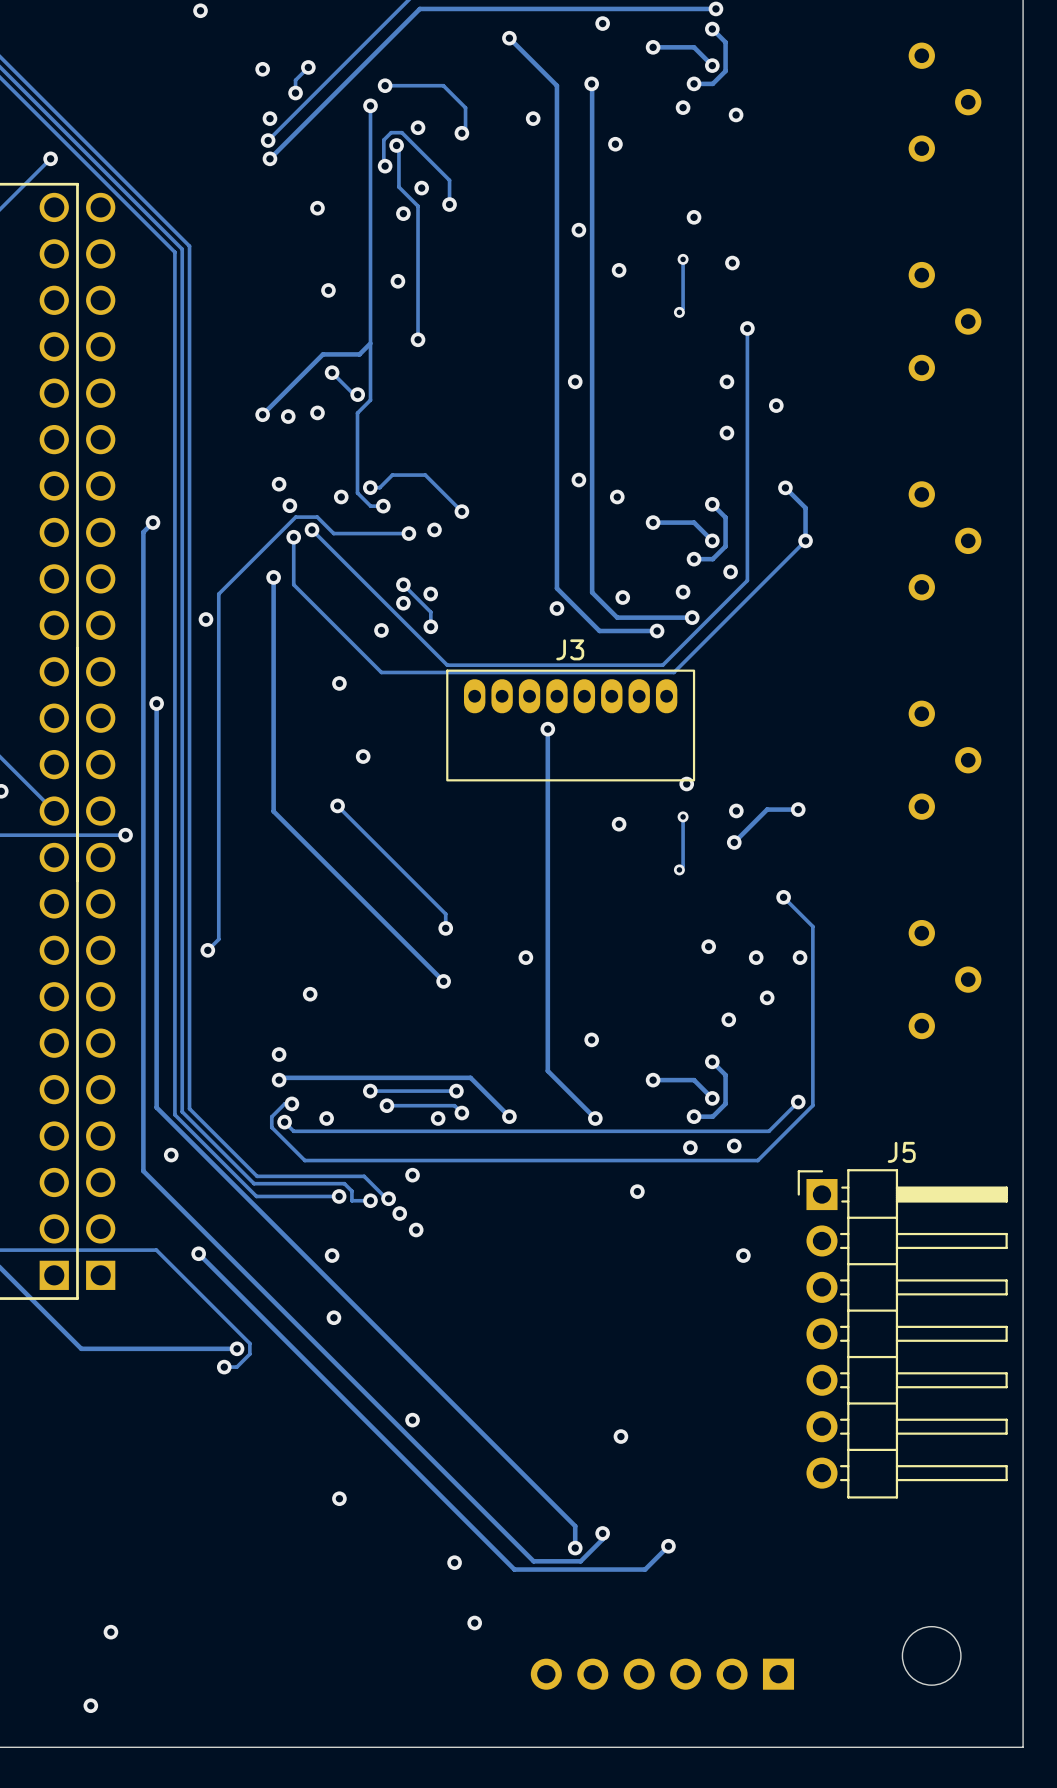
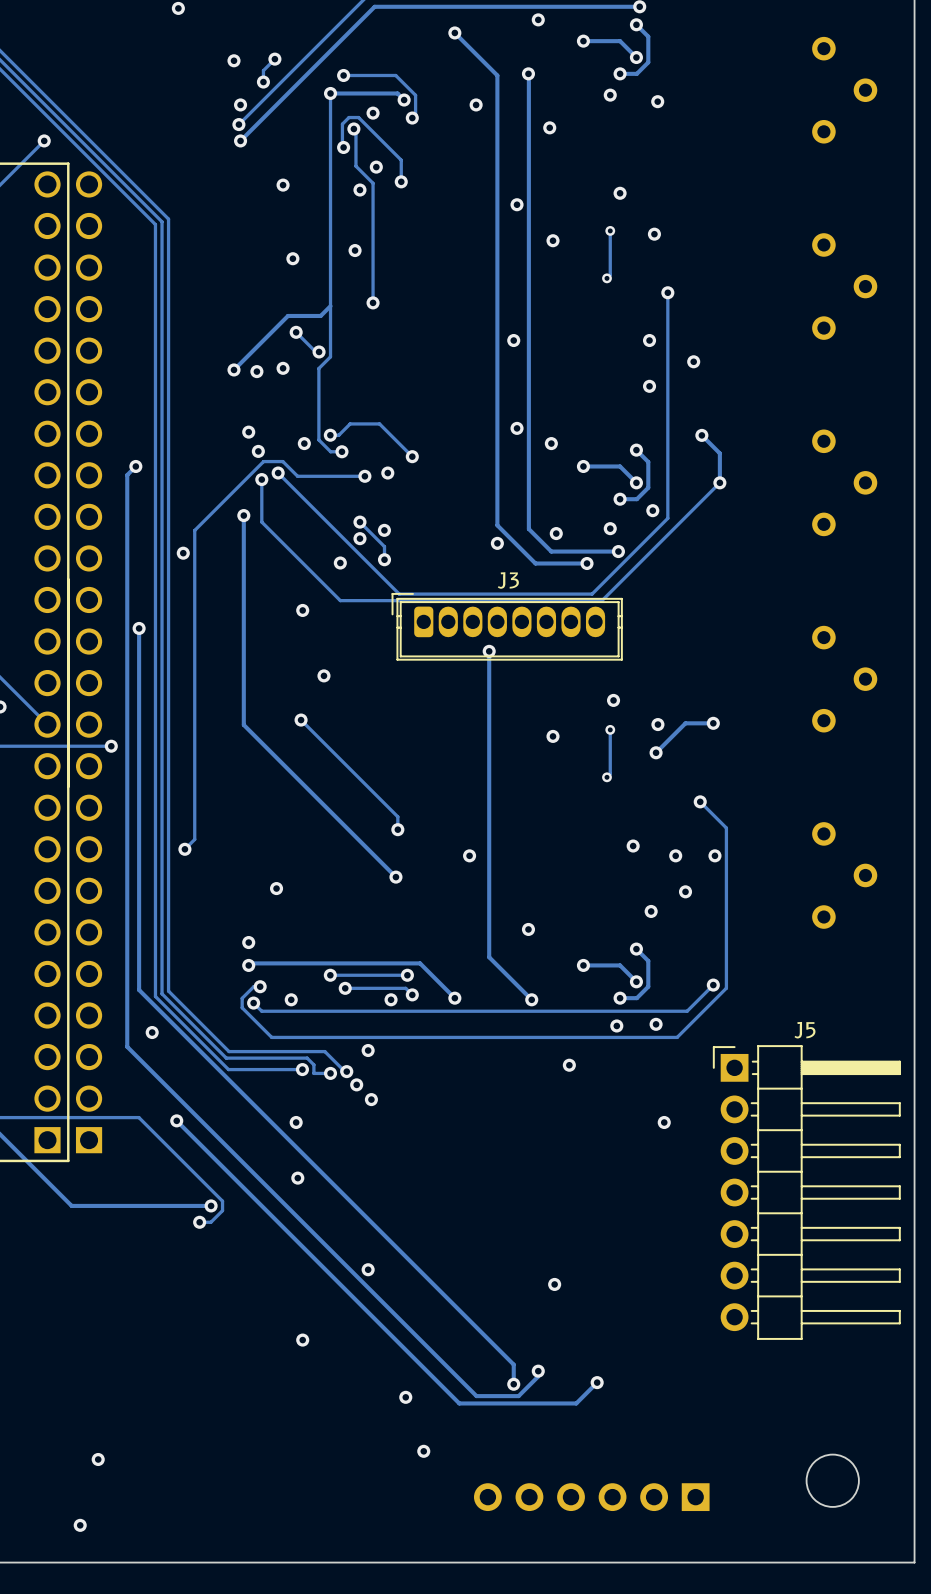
track: none -> (330, 93) (397, 93) (404, 100)
via: none -> (404, 100)
J3 footprint: [446, 669, 696, 782] -> [391, 592, 623, 661]

